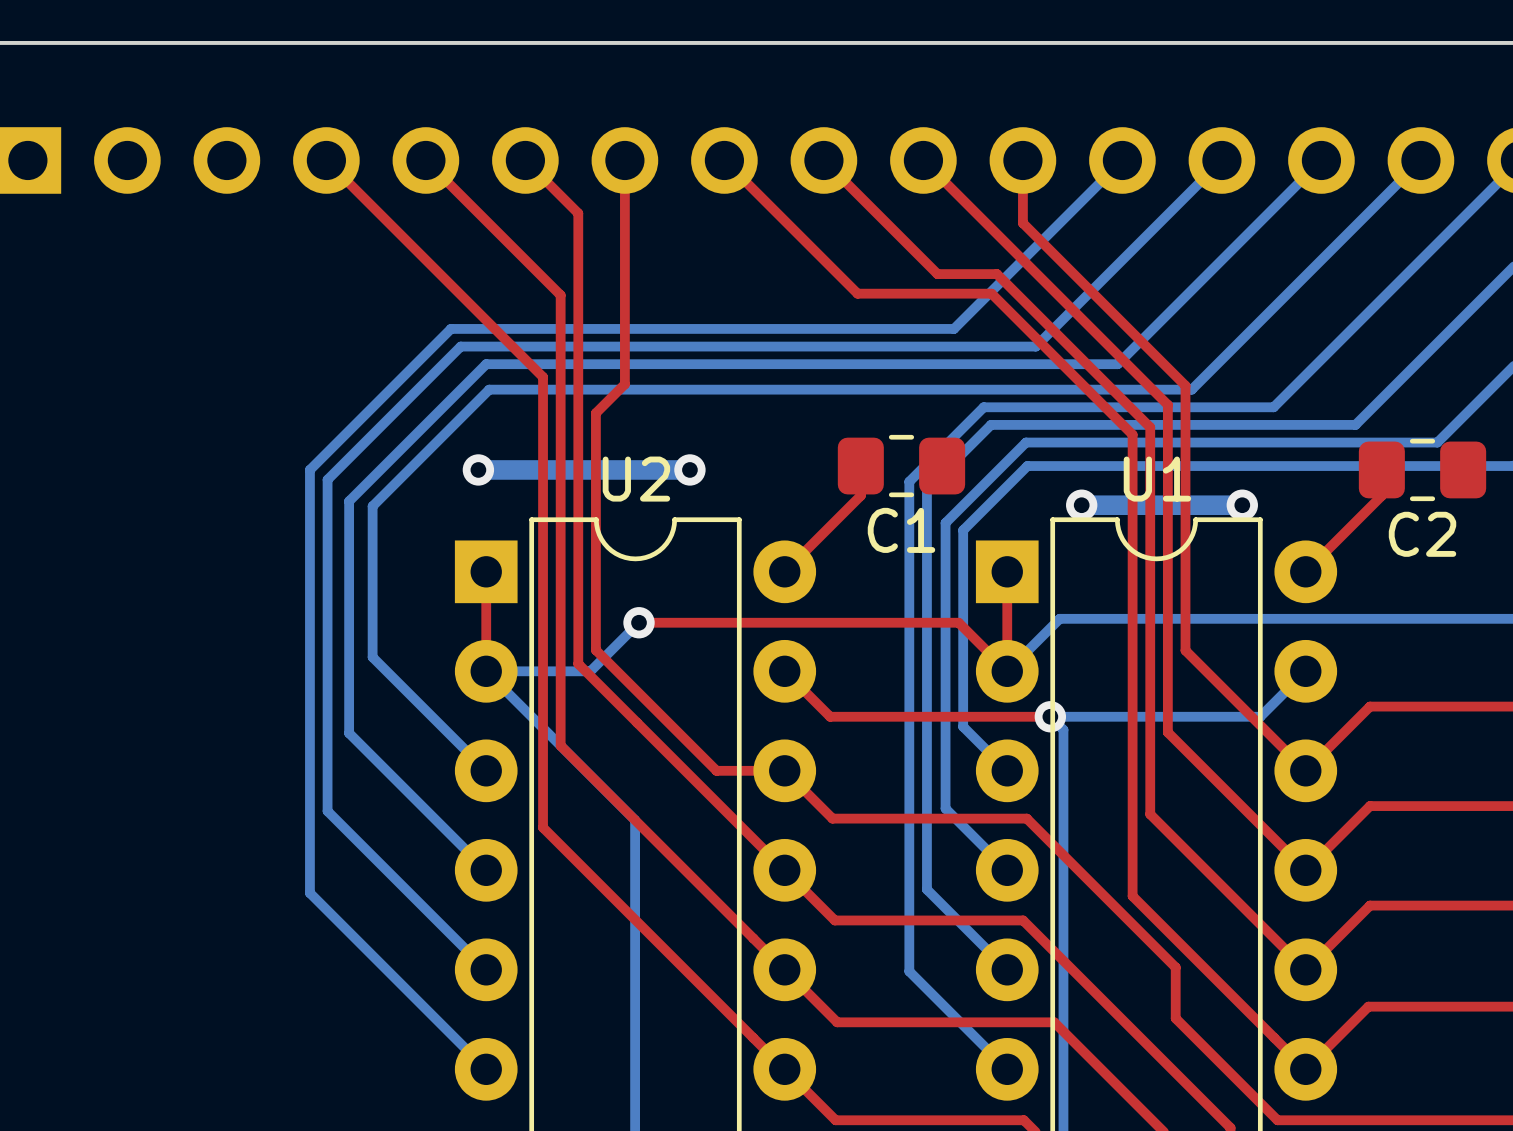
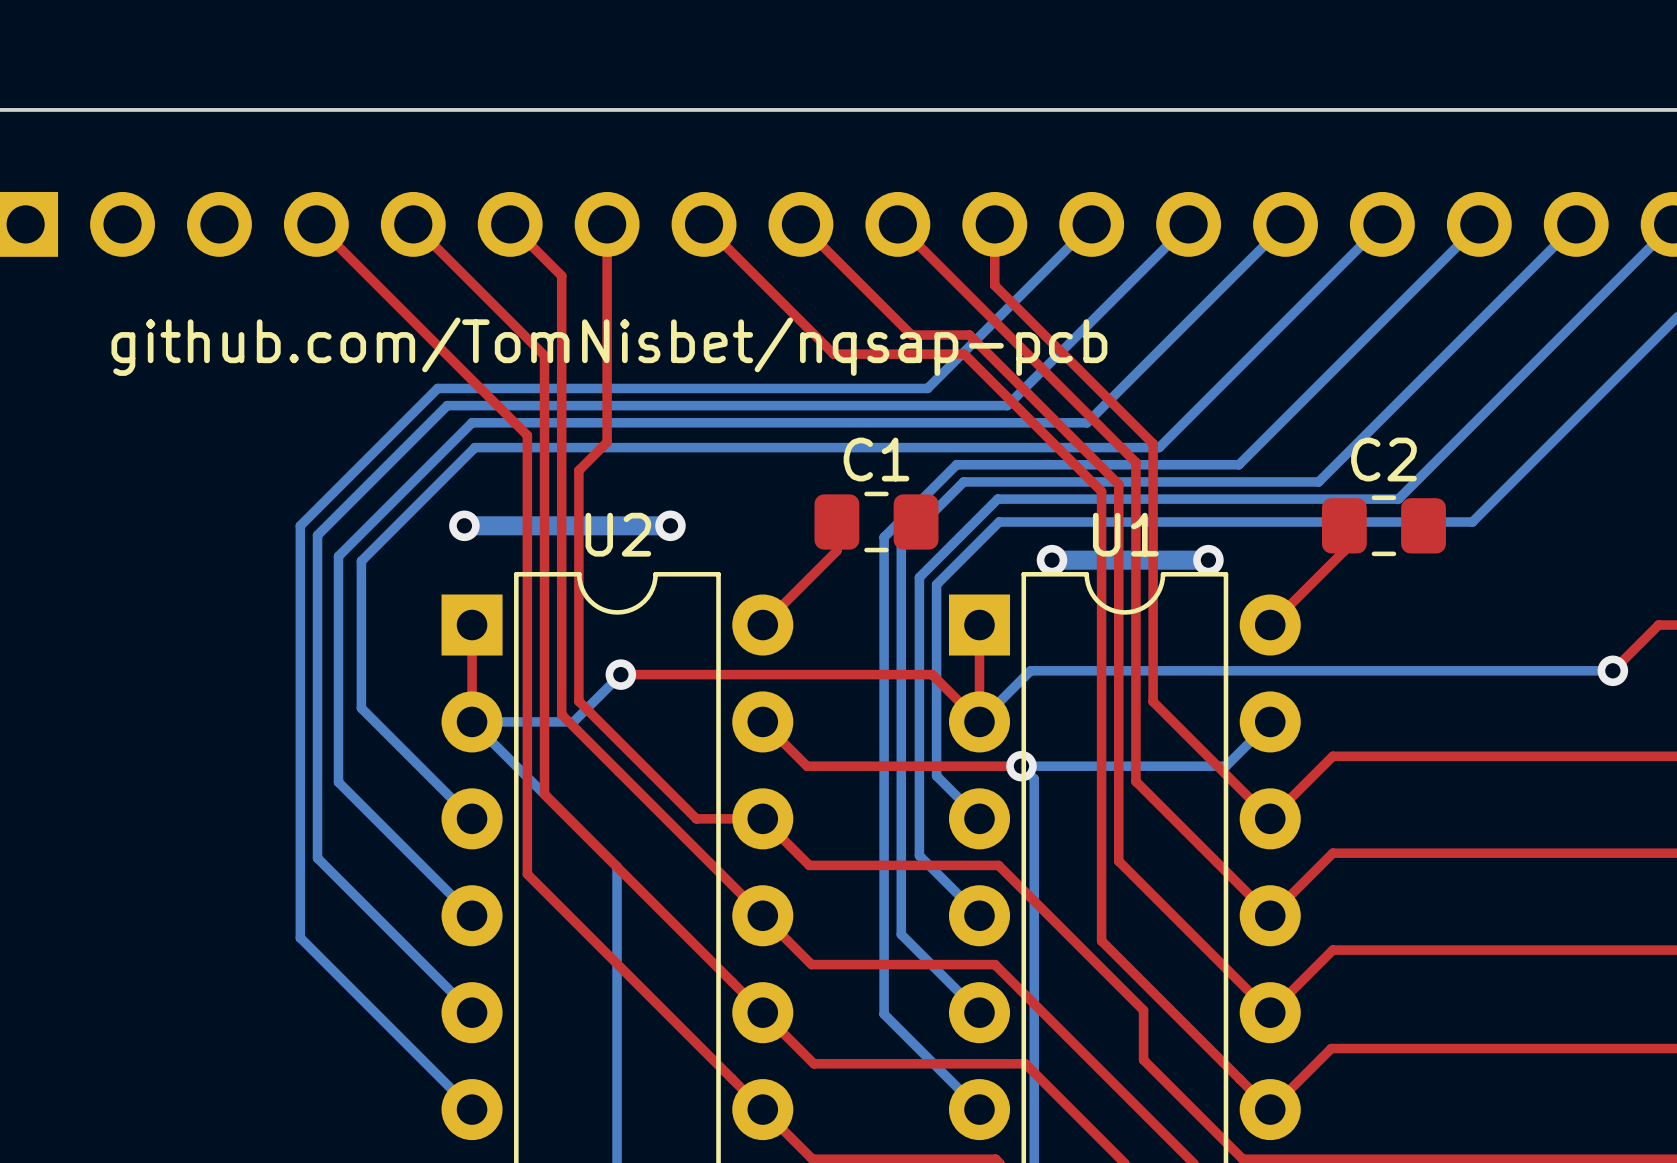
text: none -> github.com/TomNisbet/nqsap-pcb (609, 346)
C1 name position: C1 (901, 530) -> C1 (876, 459)
C2 name position: C2 (1422, 534) -> C2 (1383, 459)

